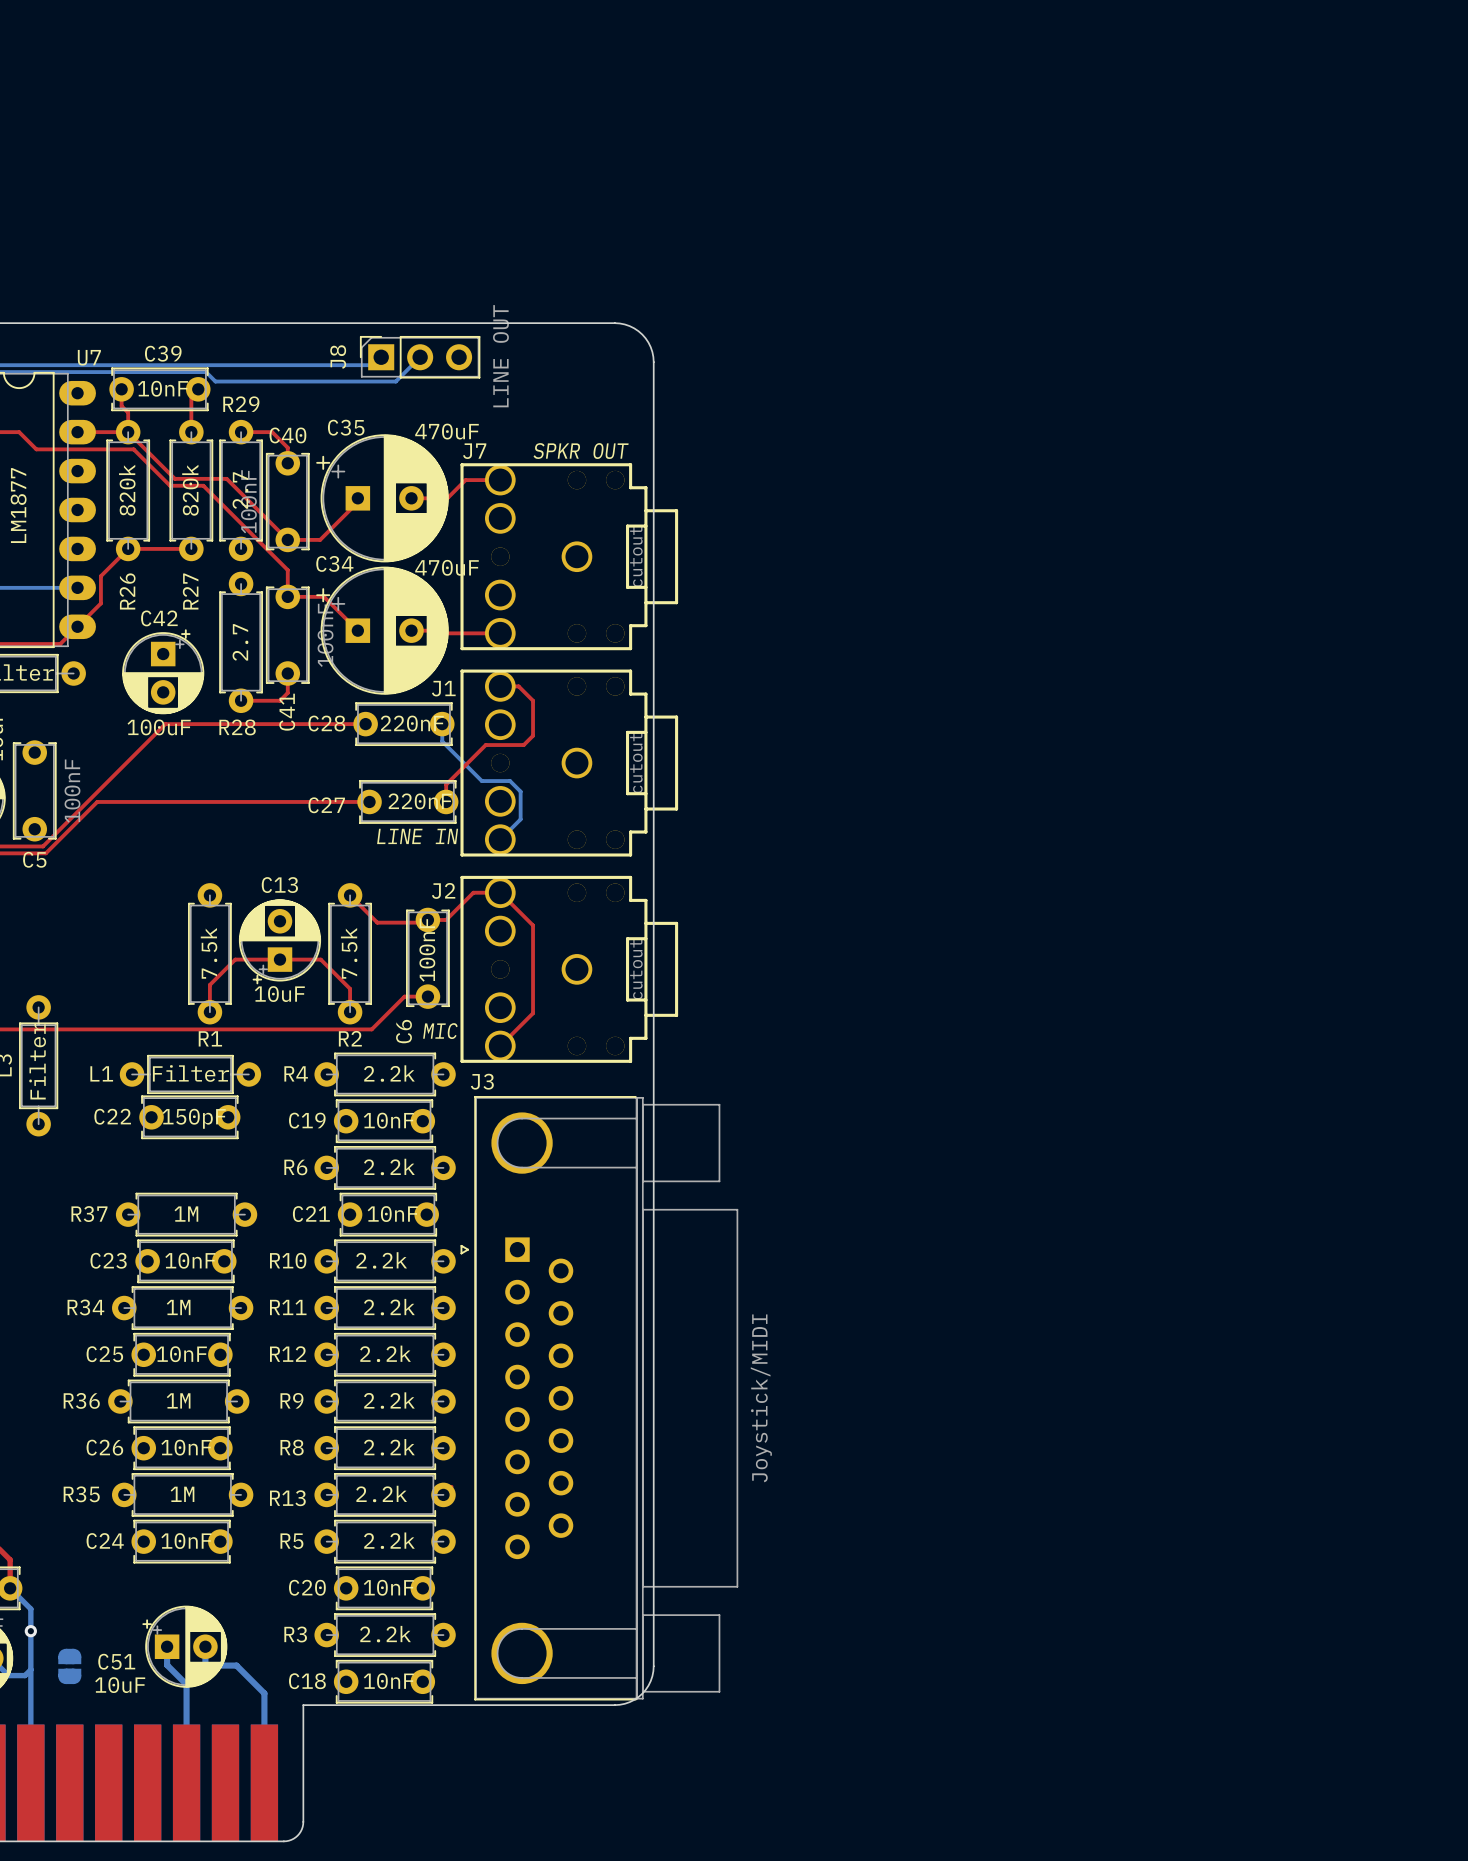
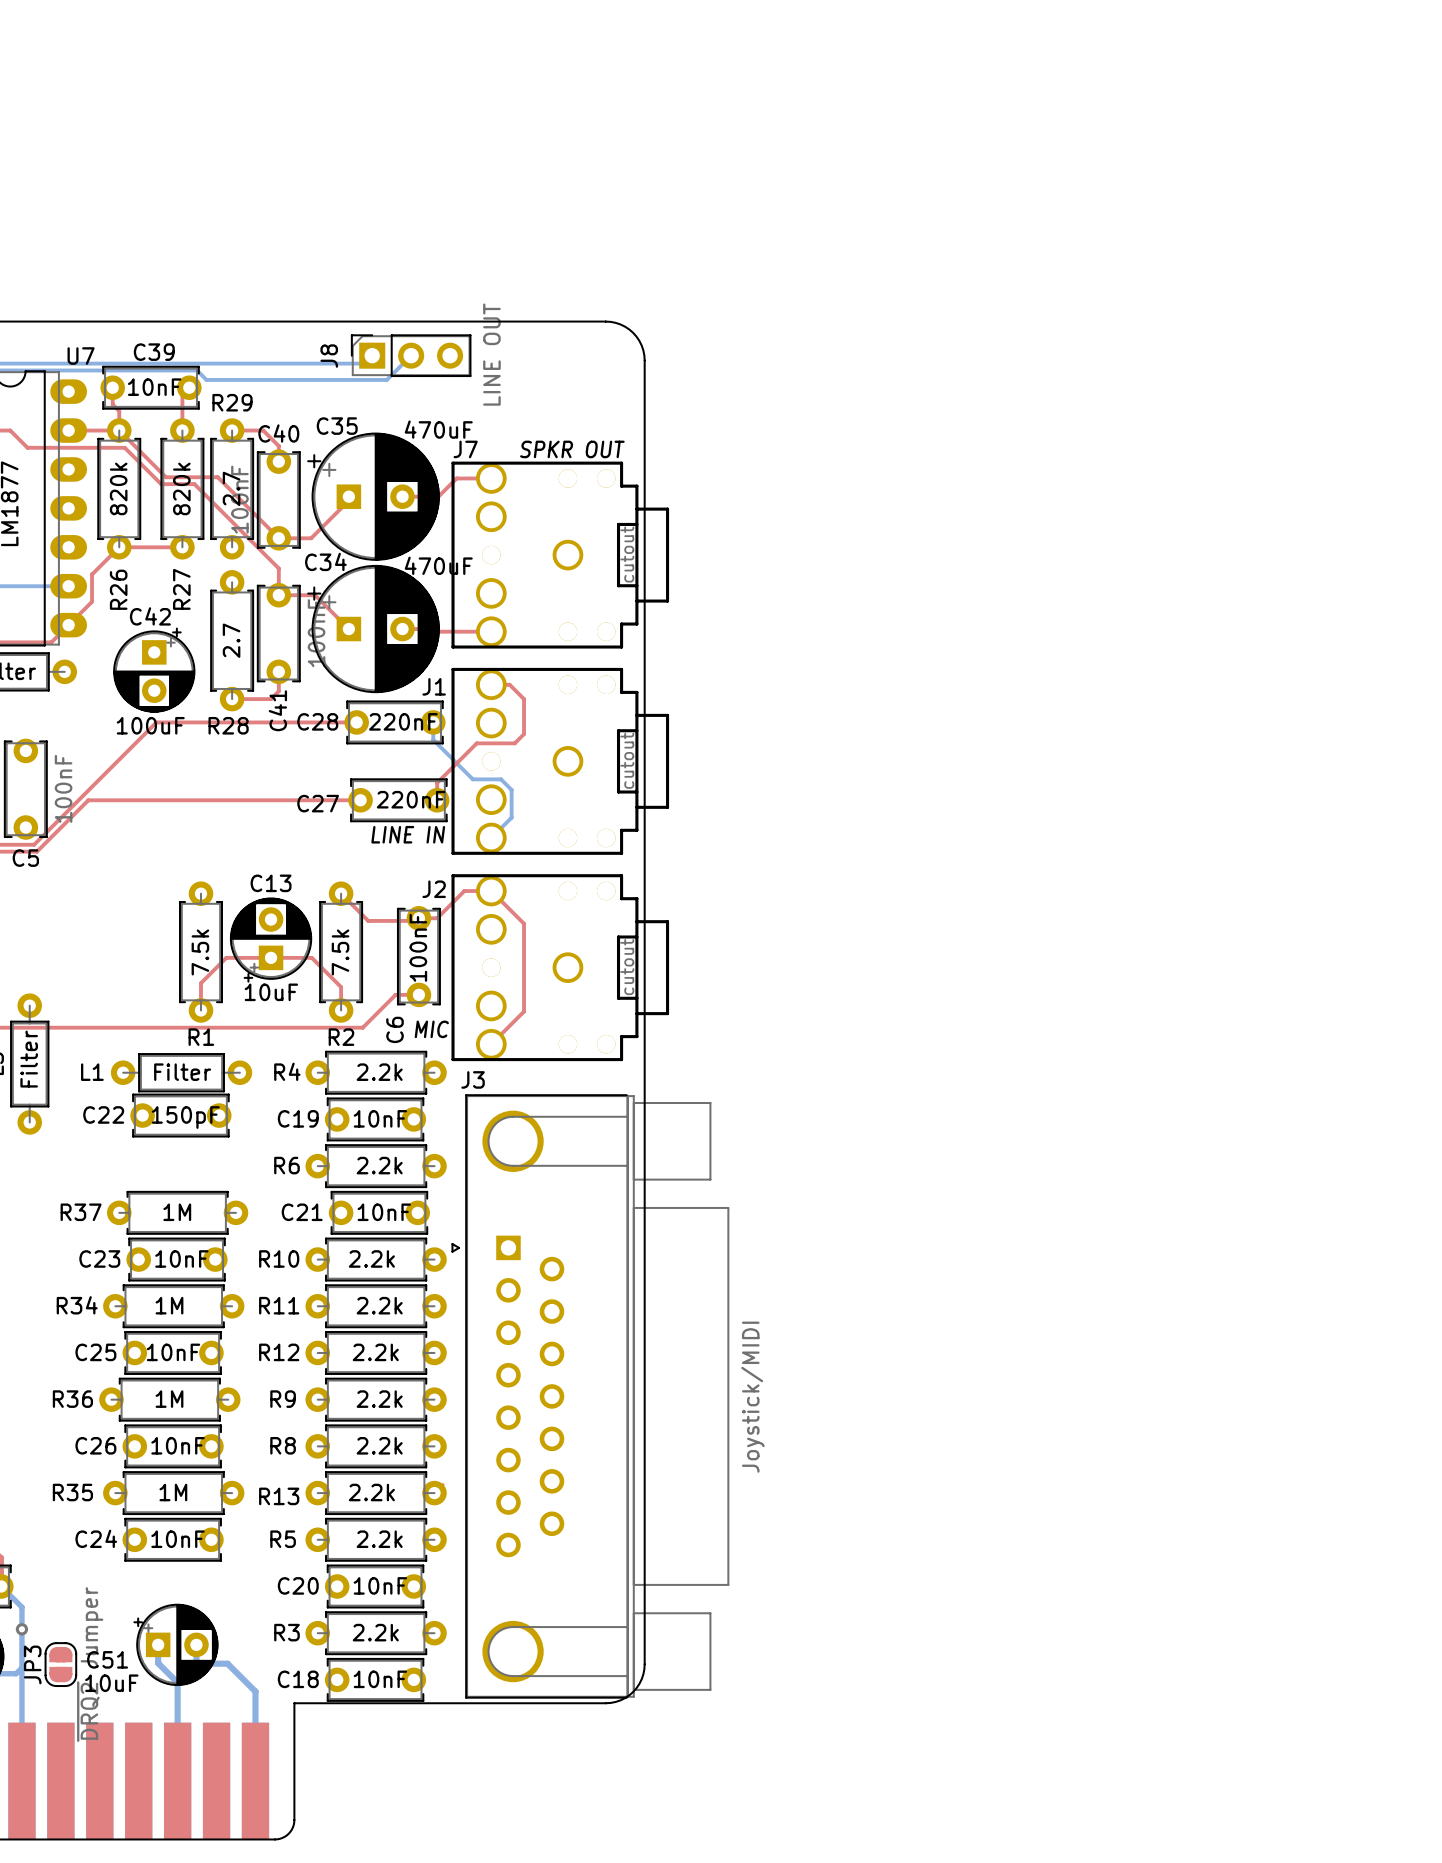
JP3 side: bottom (69, 1666) -> top (60, 1664)

